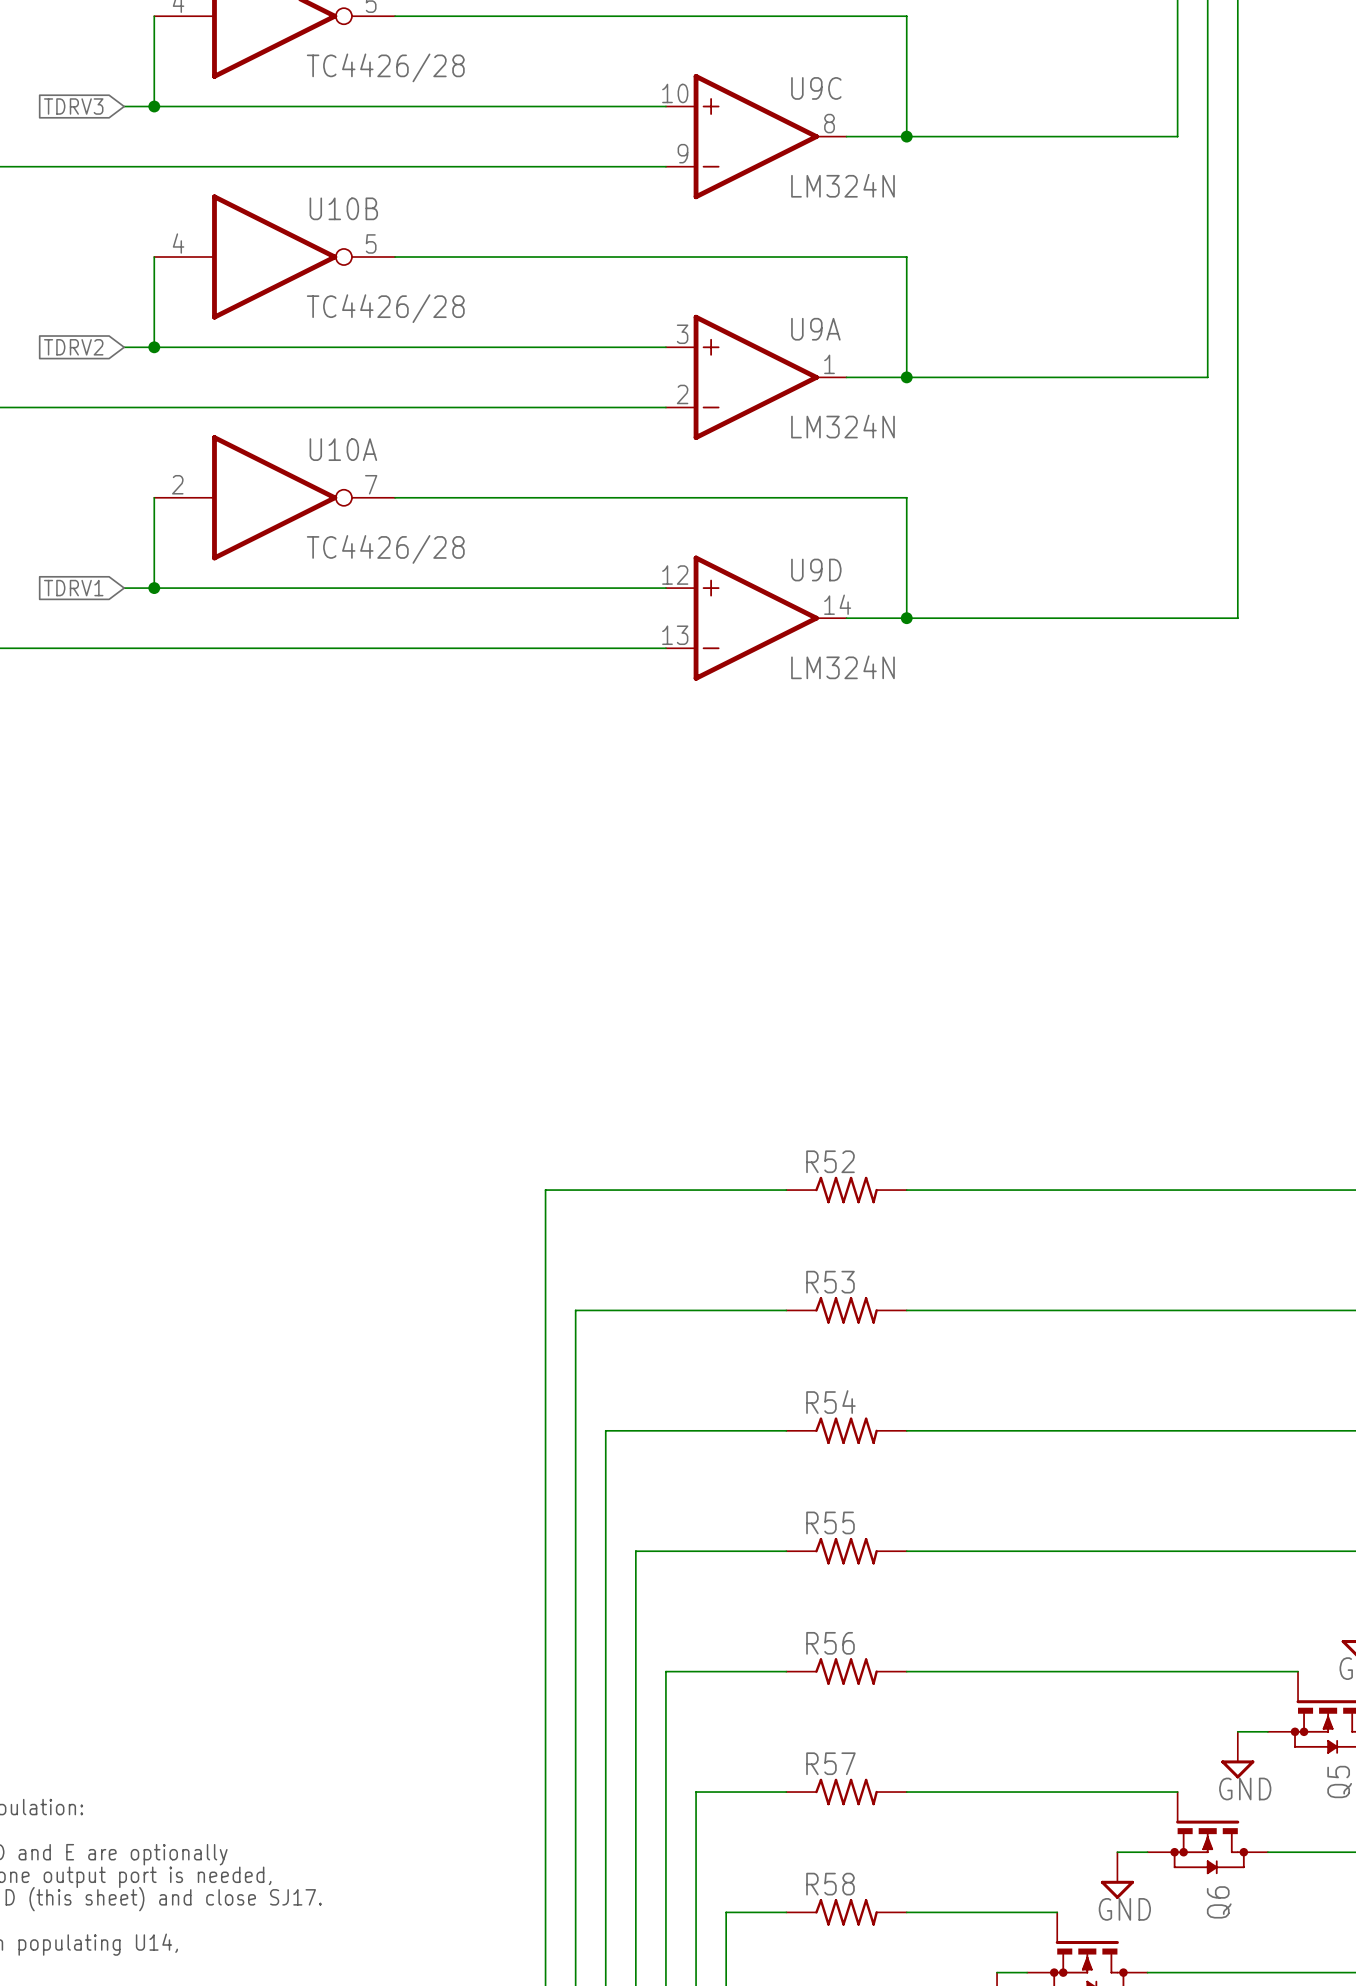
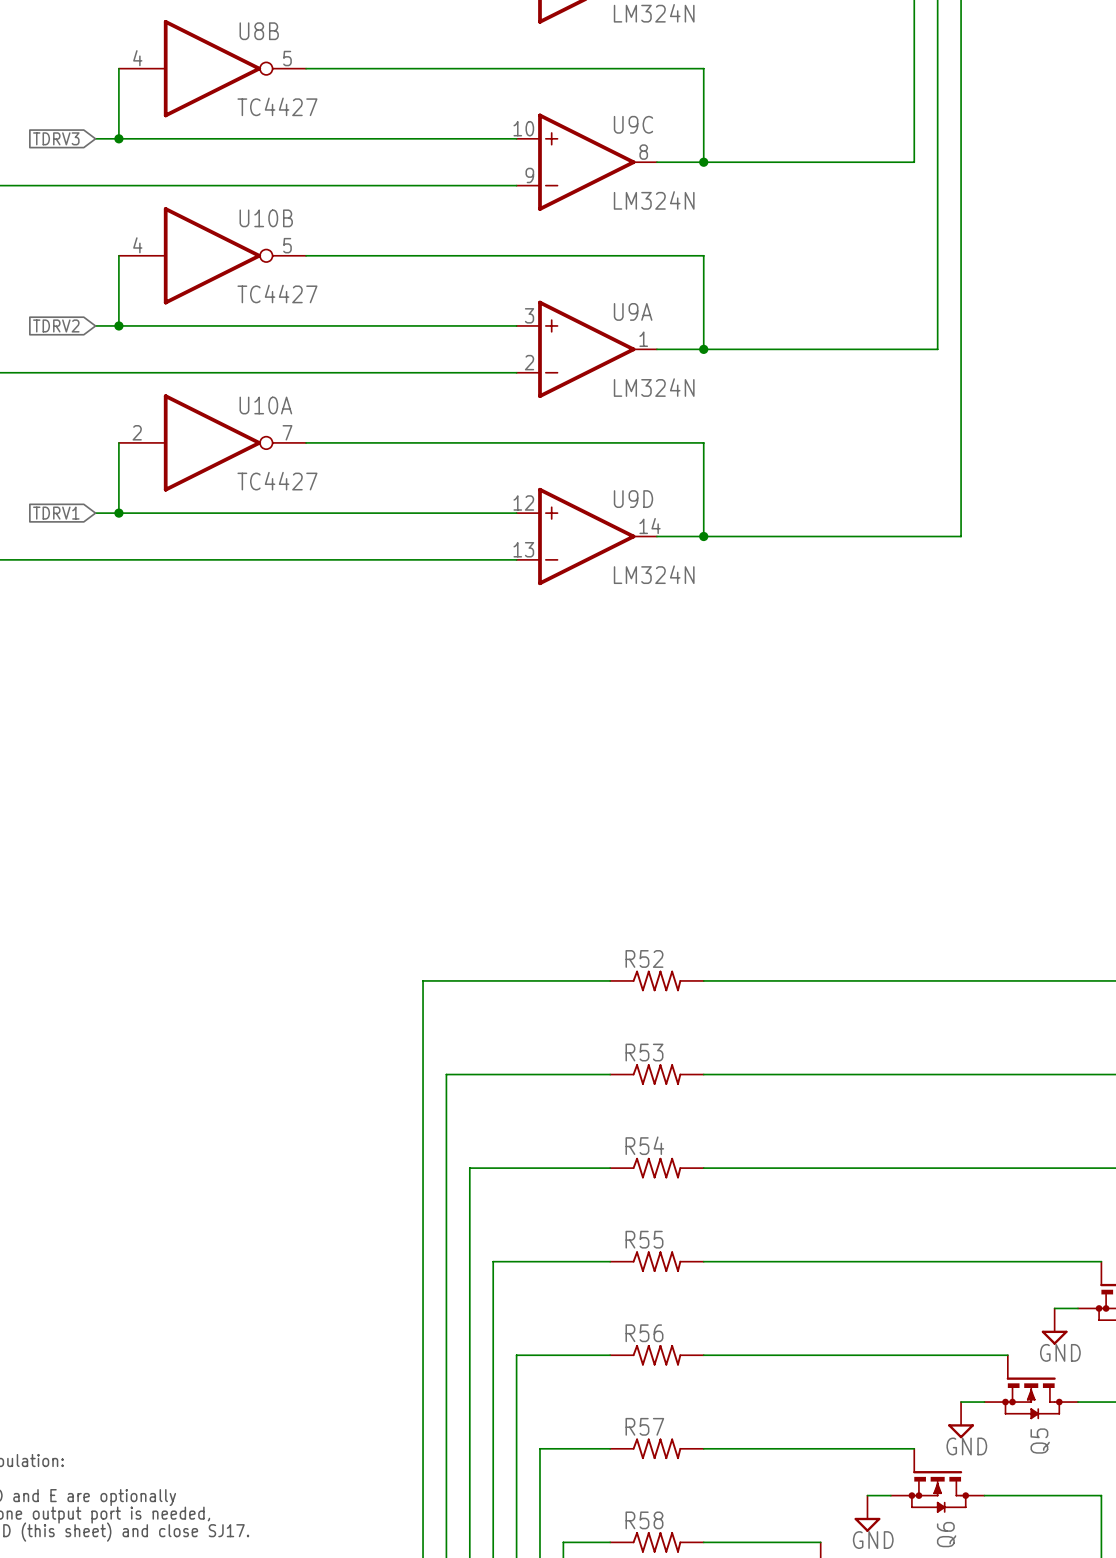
U8B value: TC4426/28 (385, 67) -> TC4427 (277, 106)
U10B value: TC4426/28 (385, 308) -> TC4427 (277, 294)
U10A value: TC4426/28 (385, 549) -> TC4427 (277, 481)

